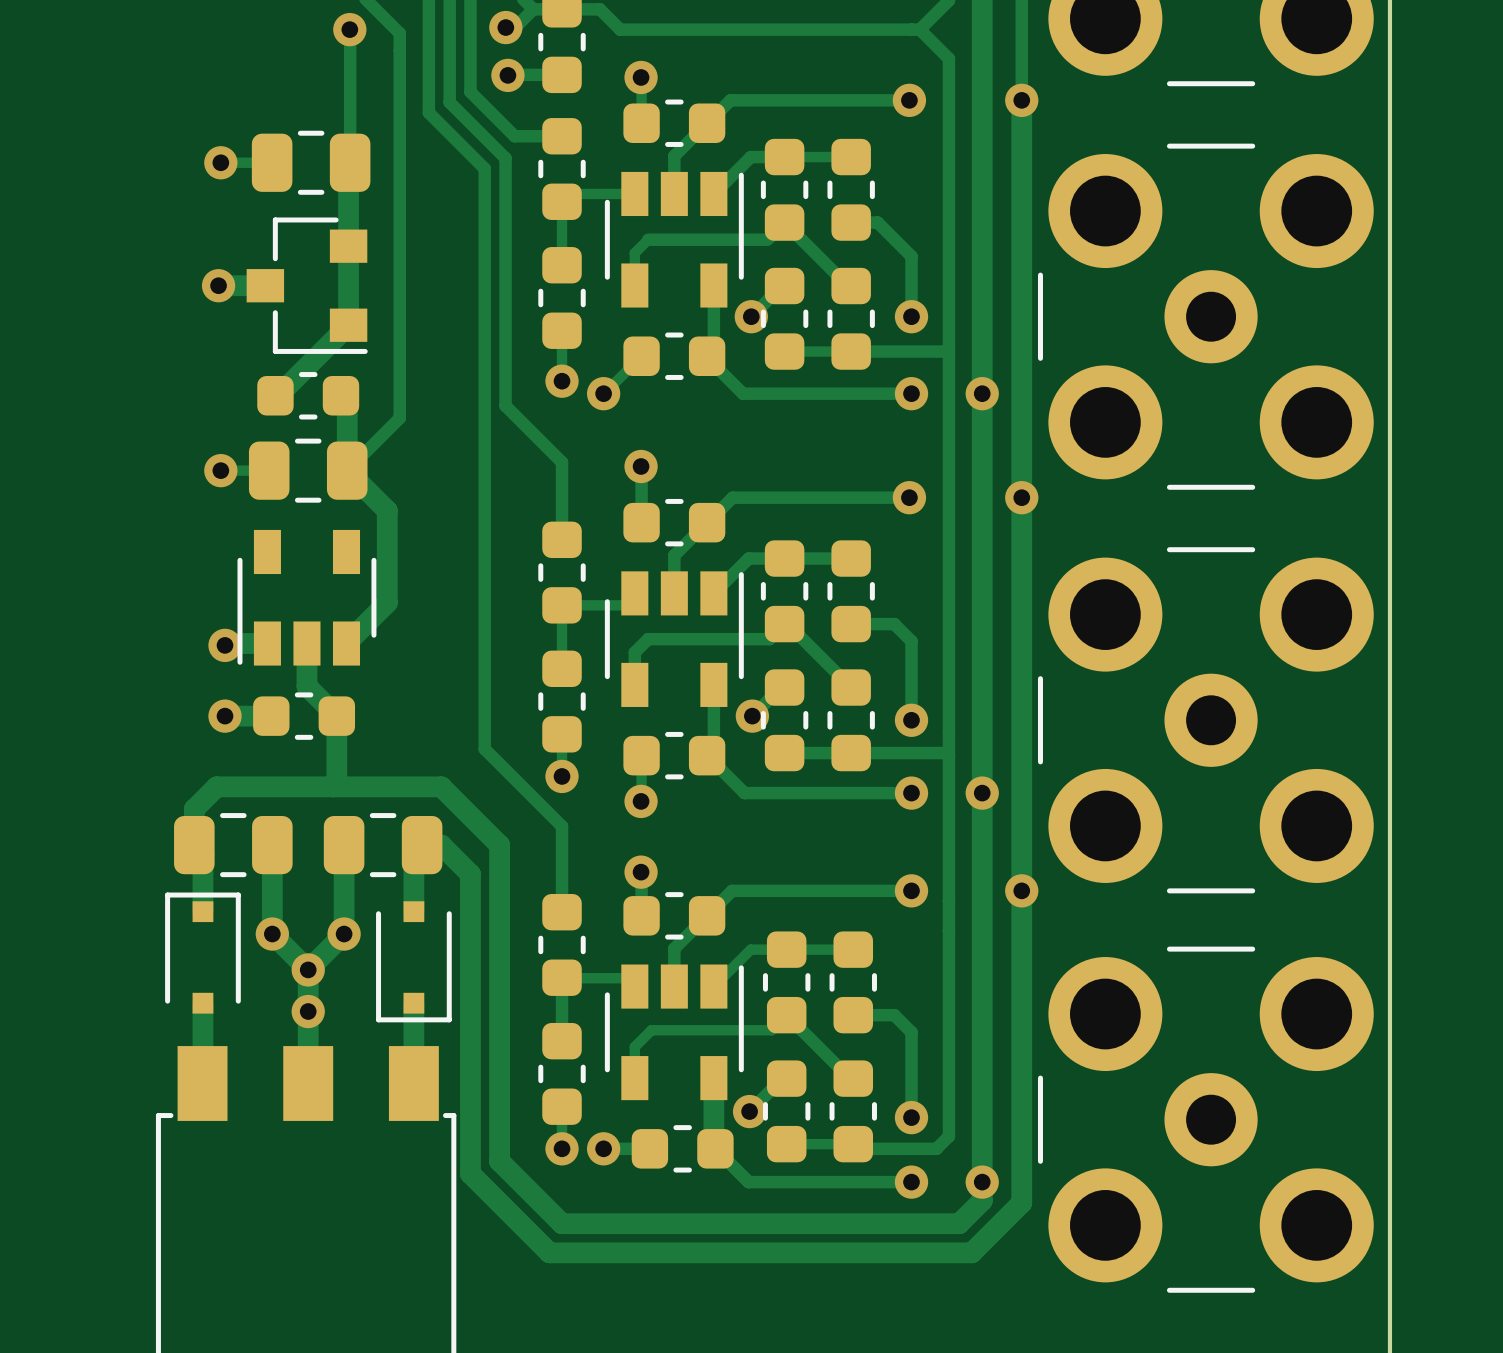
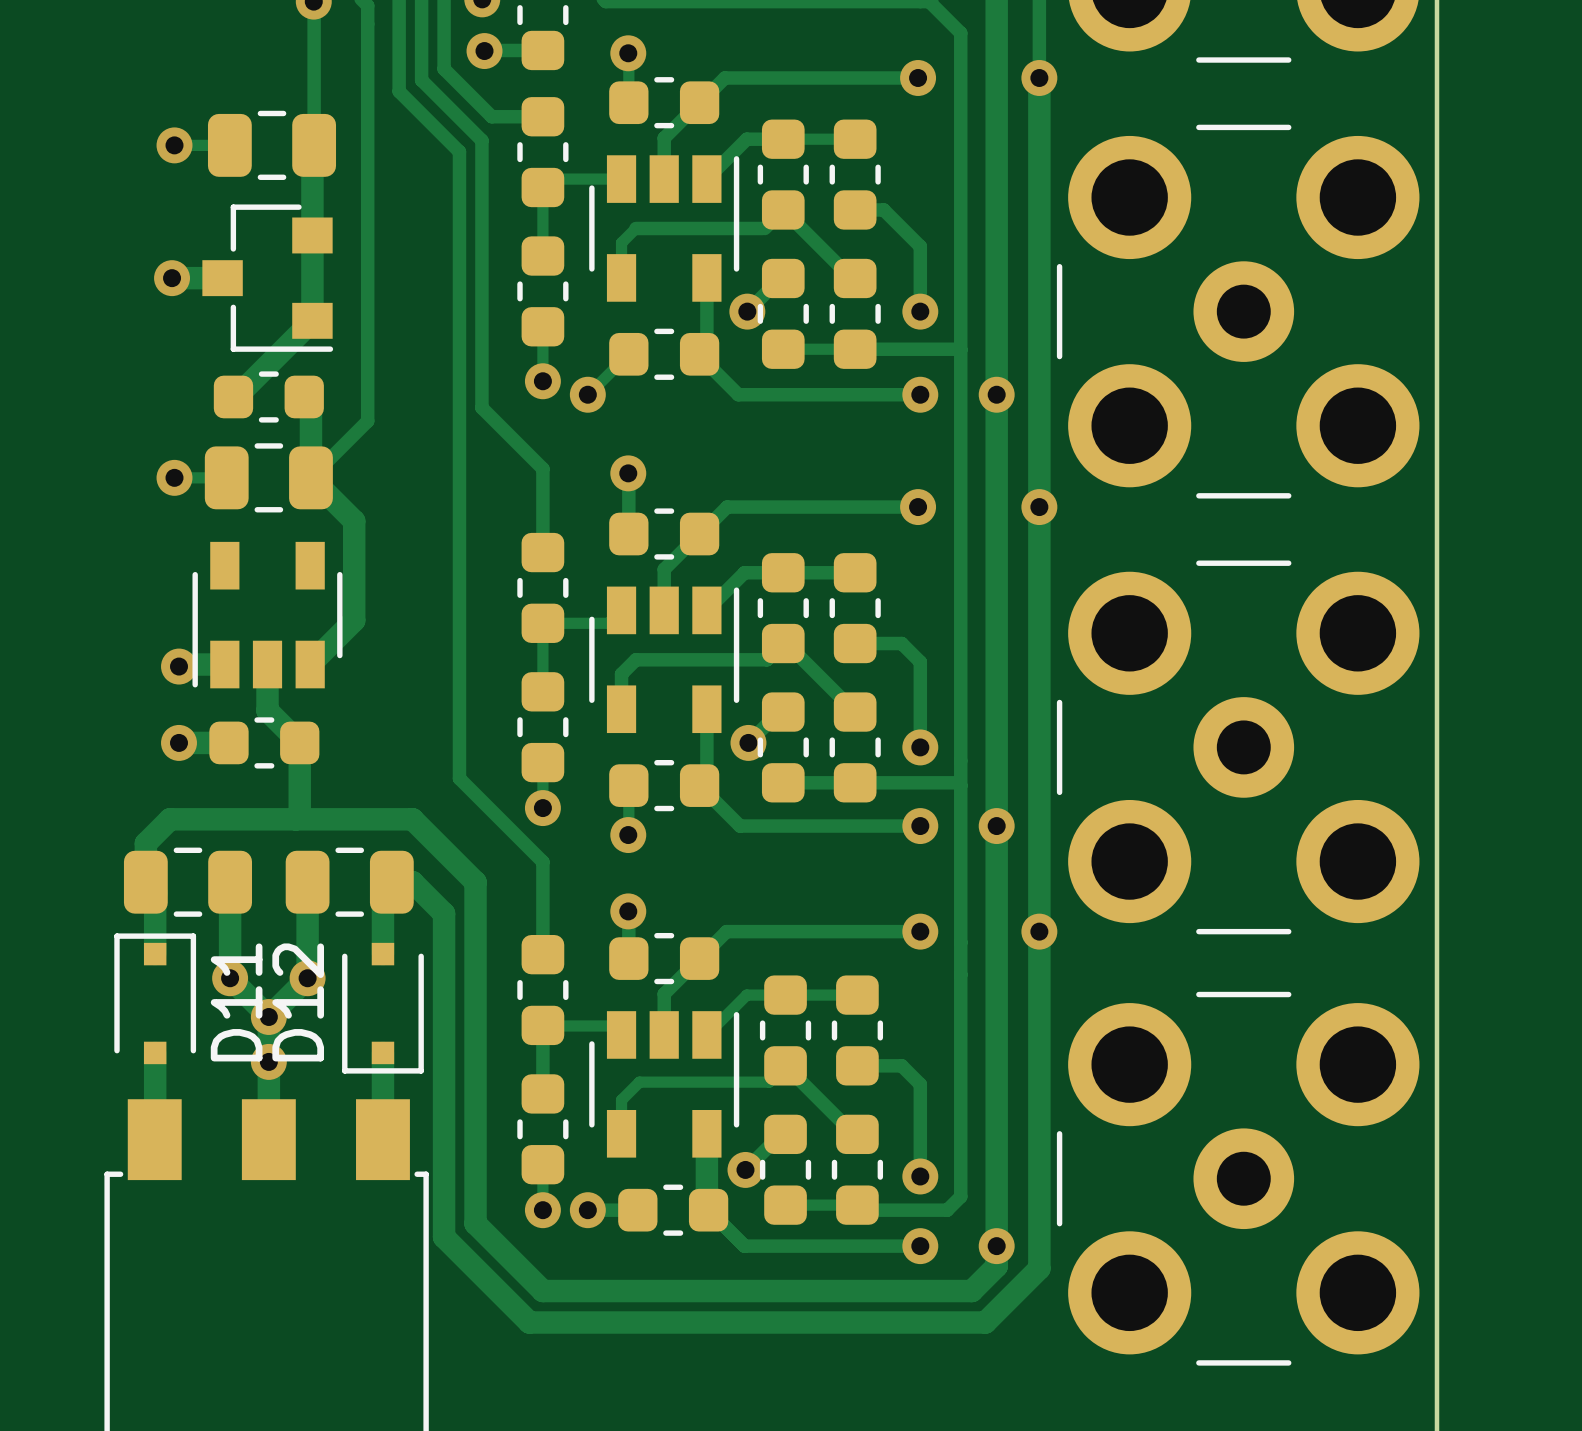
D11 name: none -> D11 (236, 1002)
D12 name: none -> D12 (298, 1002)

